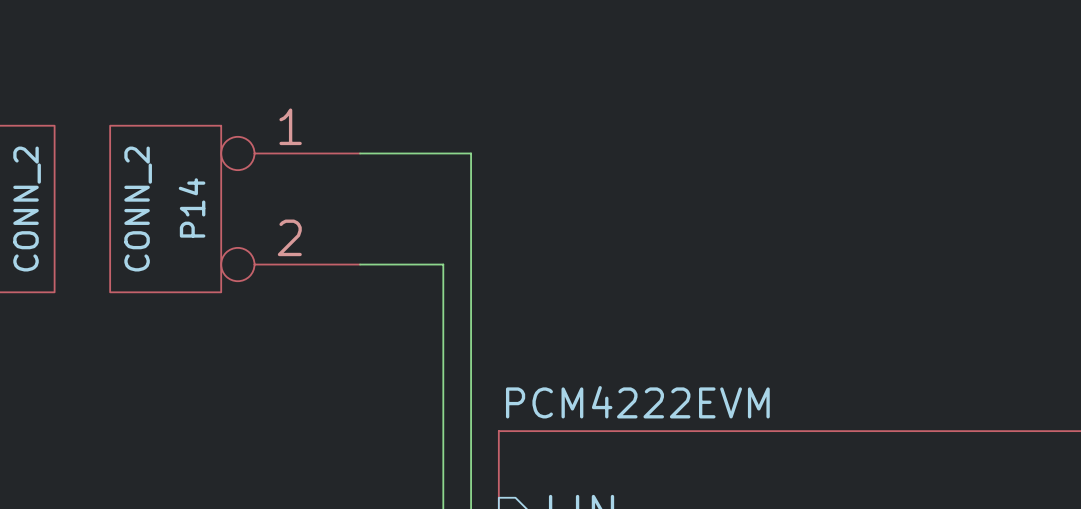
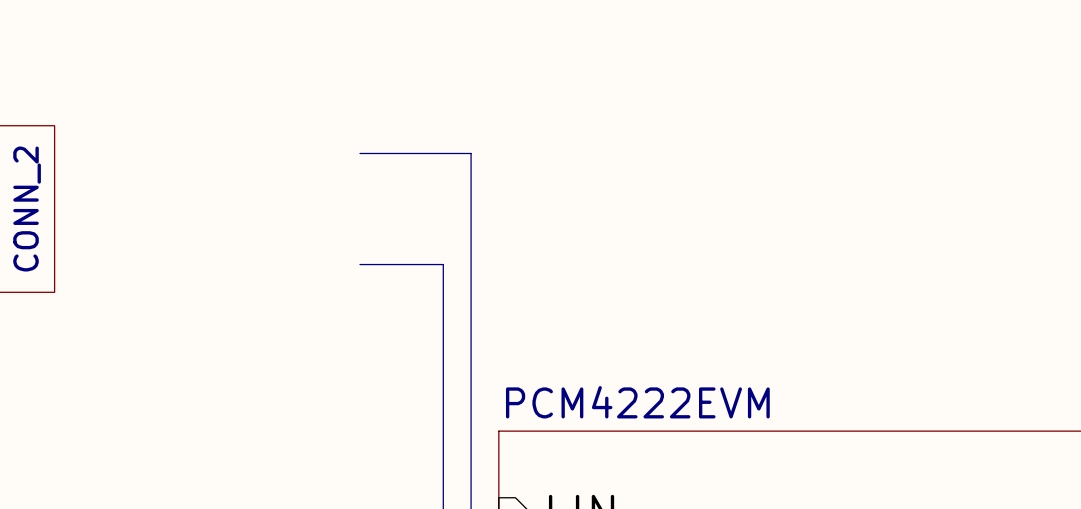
P14: CONN_2 (235, 209) -> none

